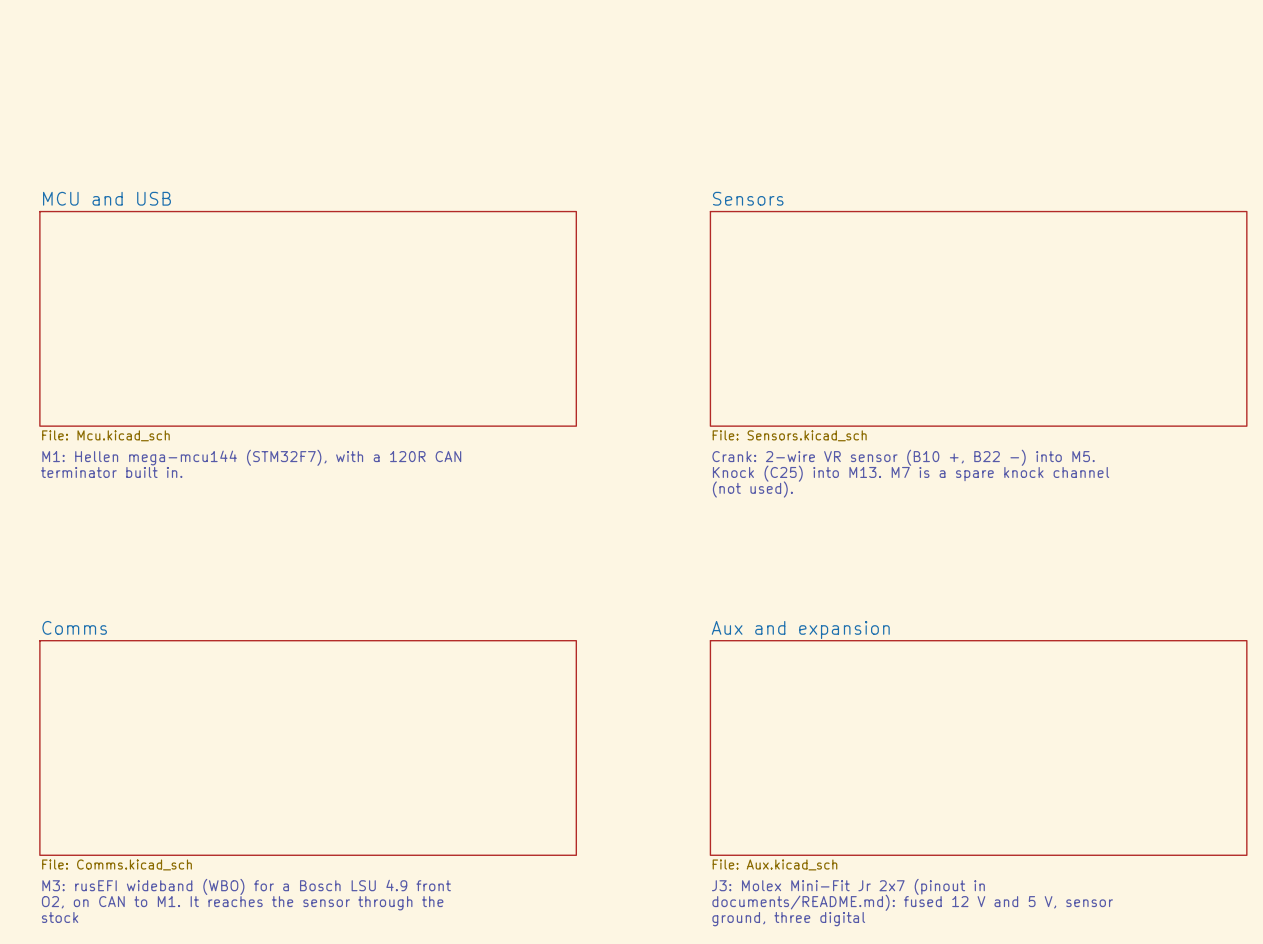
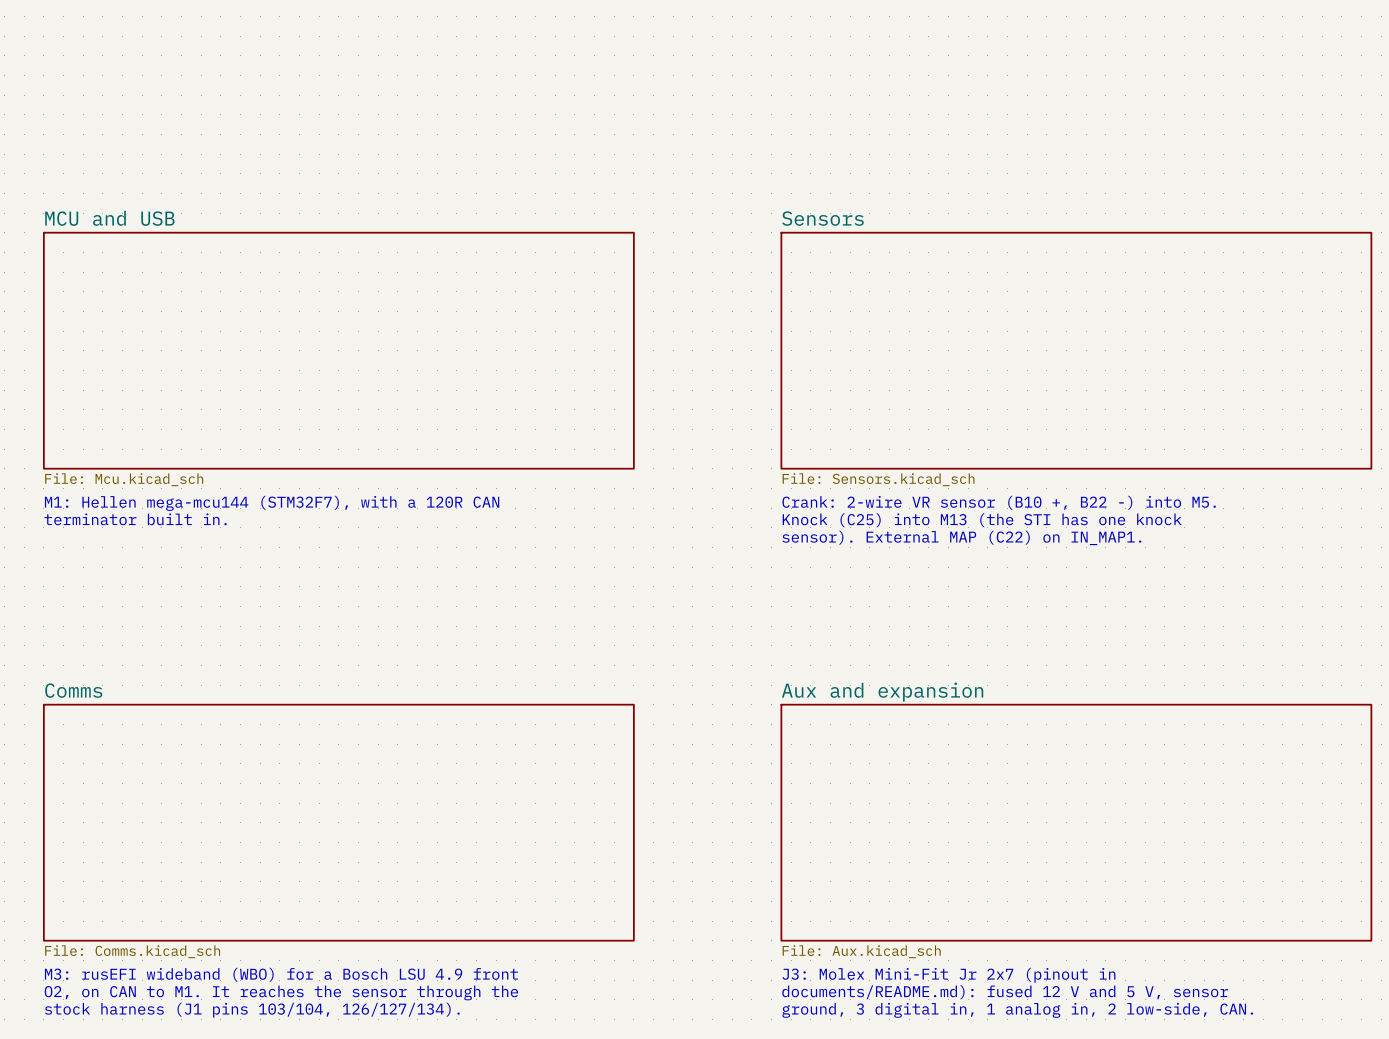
text: Knock (C25) into M13. M7 is a spare knock channel (911, 473) -> Knock (C25) into M13 (the STI has one knock (982, 520)
text: (not used). (752, 489) -> sensor). External MAP (C22) on IN_MAP1. (961, 537)
text: stock (60, 917) -> stock harness (J1 pins 103/104, 126/127/134). (252, 1010)
text: ground, three digital (788, 919) -> ground, 3 digital in, 1 analog in, 2 low-side, CAN. (1017, 1010)

